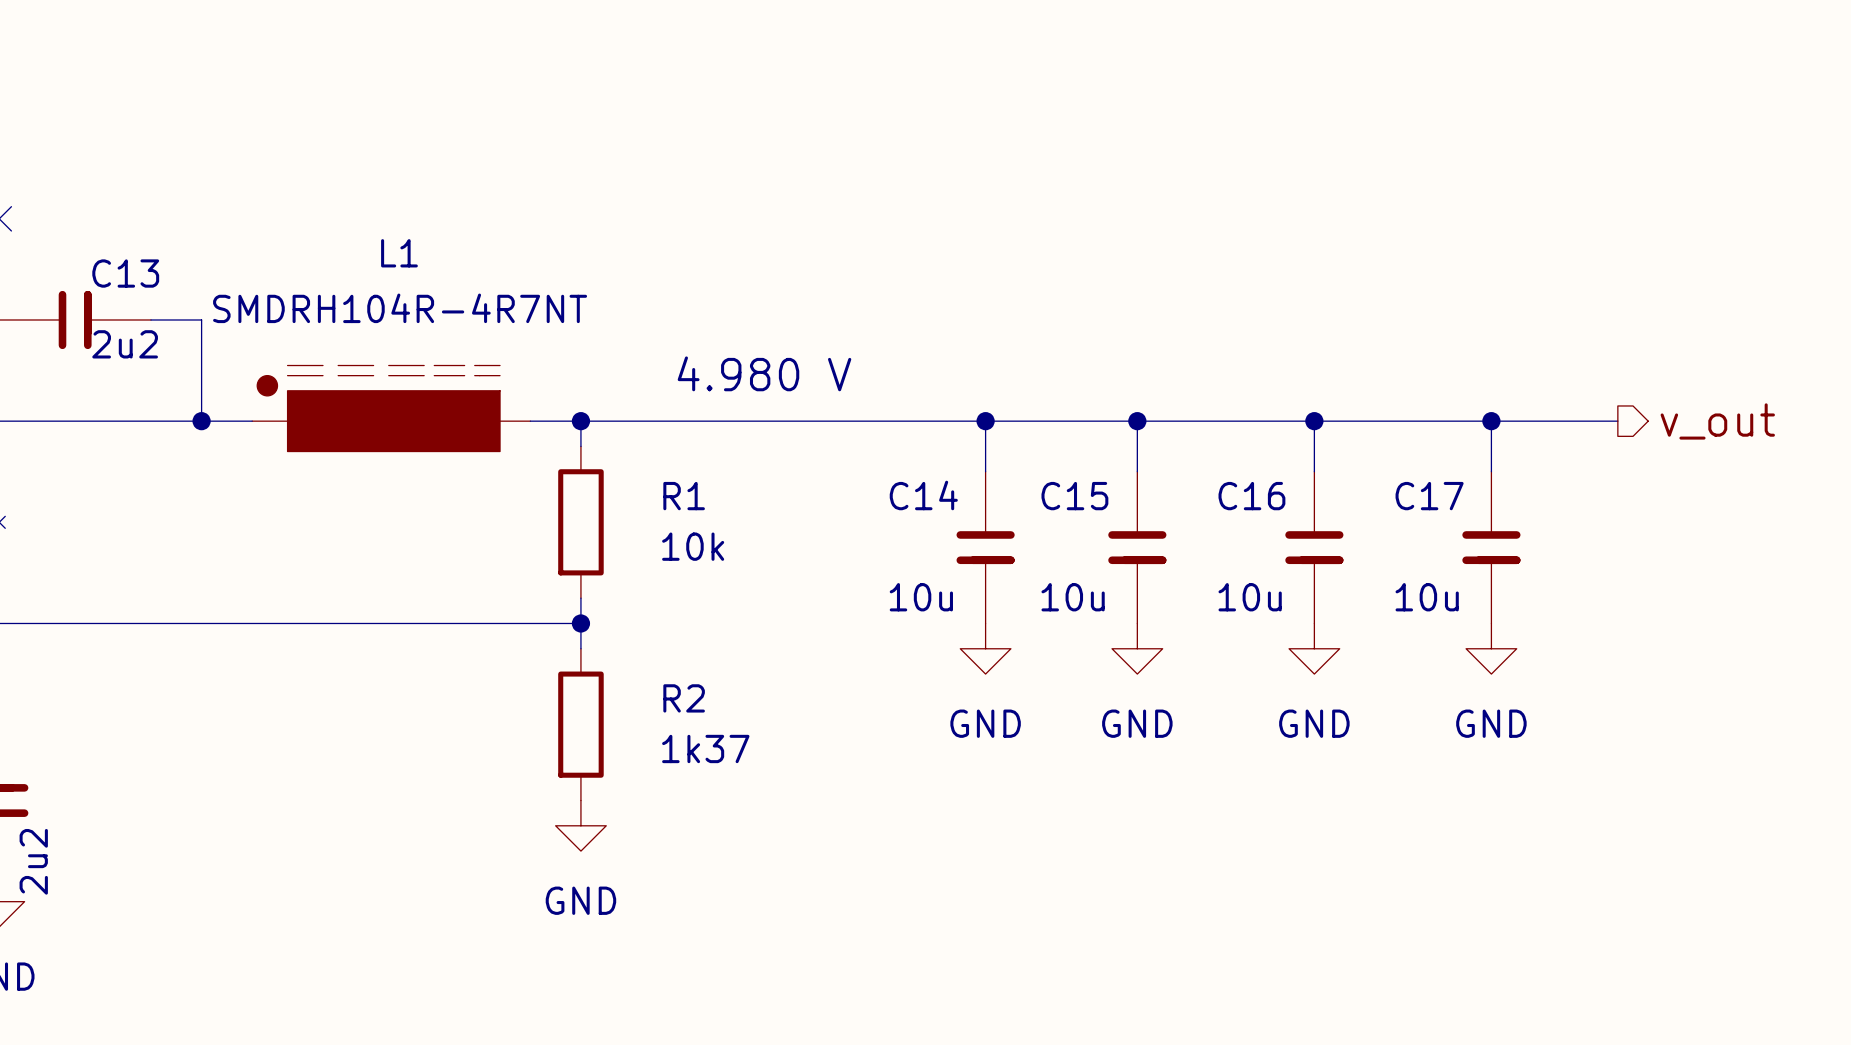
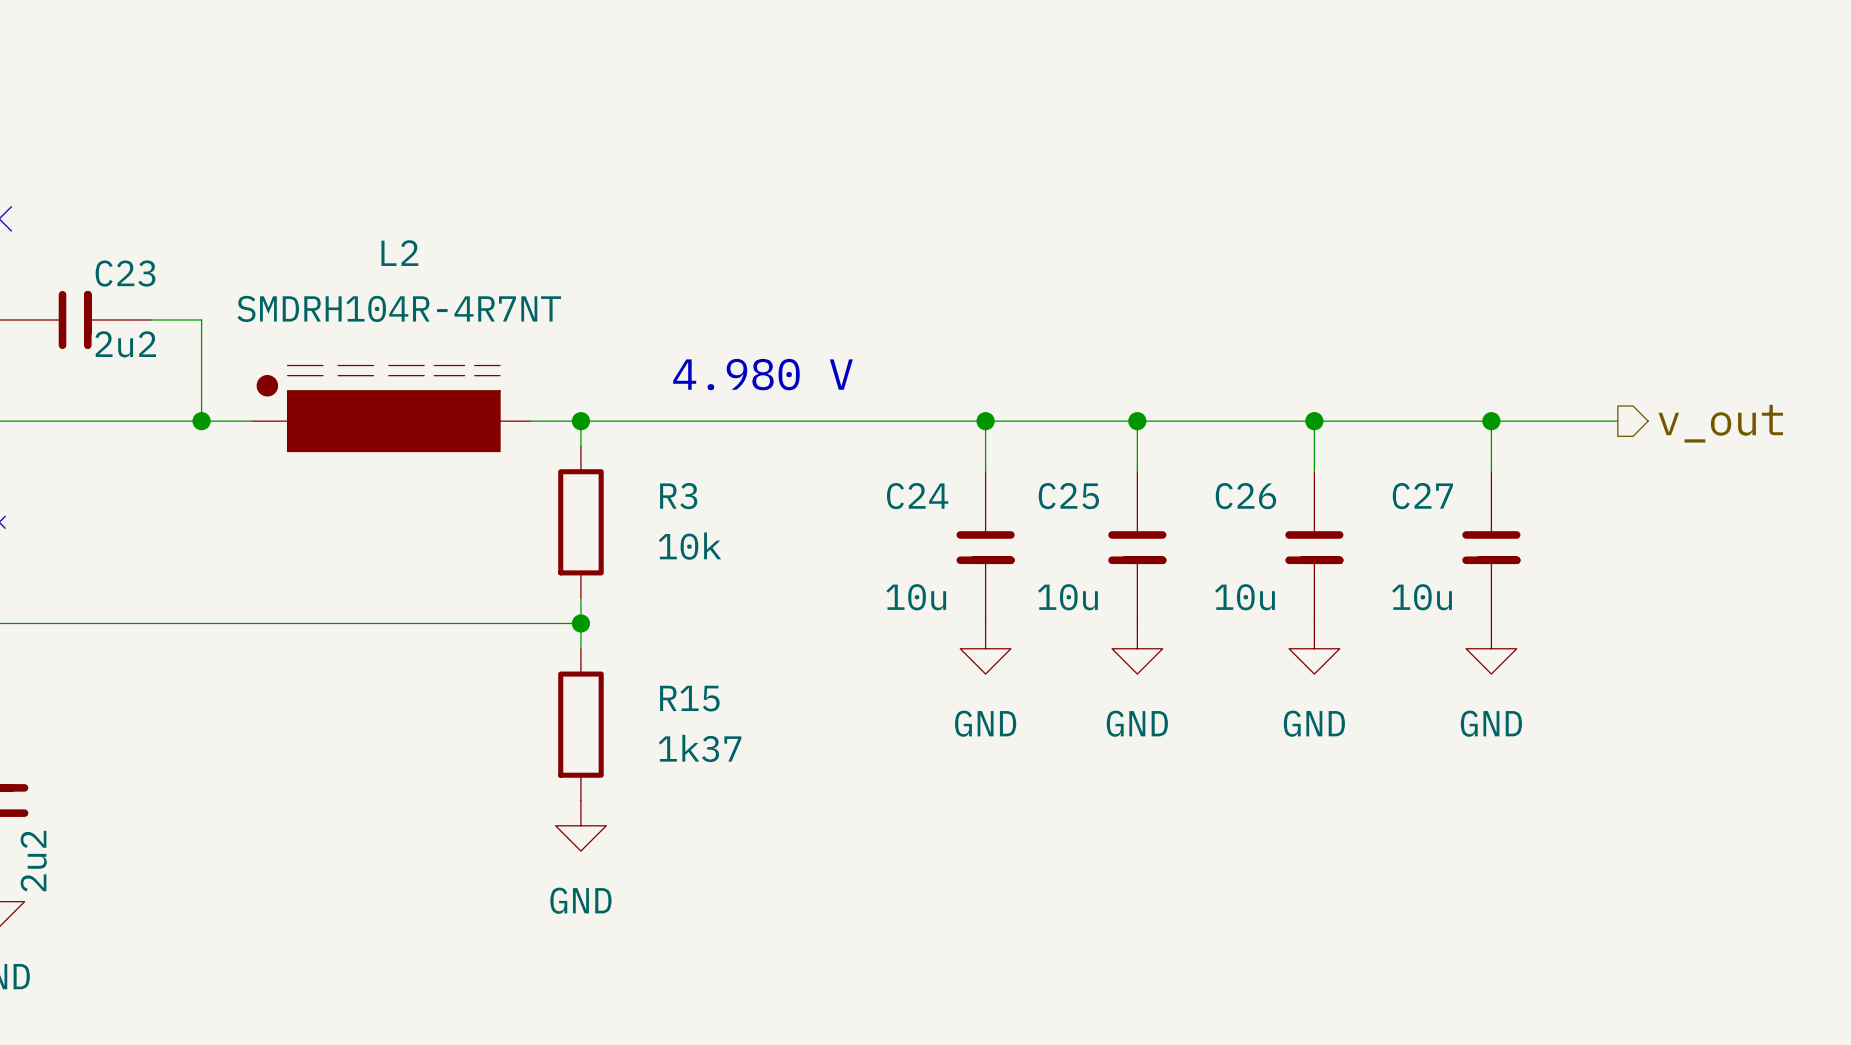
L1 name: L1 (399, 253) -> L2 (399, 253)
C13 name: C13 (125, 273) -> C23 (125, 273)
C14 name: C14 (923, 495) -> C24 (917, 496)
R1 name: R1 (684, 496) -> R3 (678, 496)
C15 name: C15 (1074, 496) -> C25 (1068, 496)
C16 name: C16 (1251, 496) -> C26 (1245, 496)
C17 name: C17 (1429, 496) -> C27 (1422, 496)
R2 name: R2 (684, 698) -> R15 (689, 698)

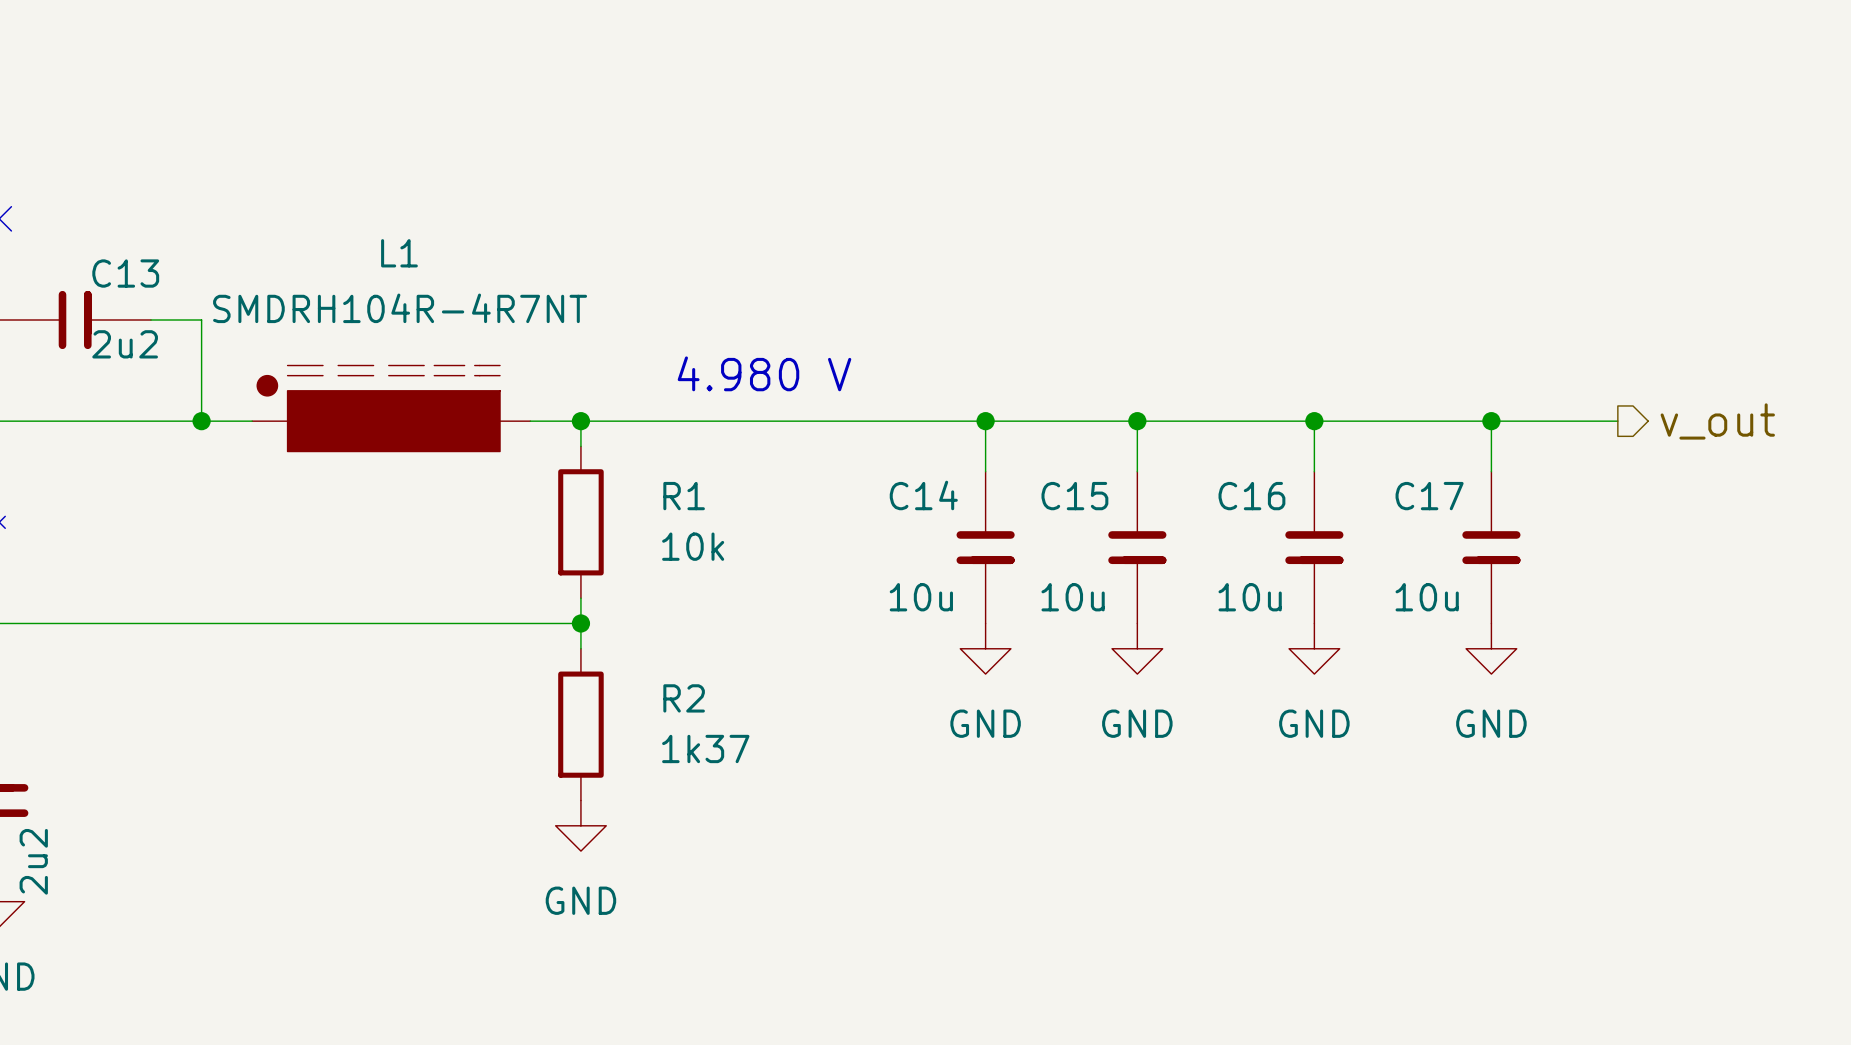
L2 name: L2 (399, 253) -> L1 (399, 253)
C23 name: C23 (125, 273) -> C13 (125, 273)
R3 name: R3 (678, 496) -> R1 (684, 496)
C24 name: C24 (917, 496) -> C14 (923, 495)
C25 name: C25 (1068, 496) -> C15 (1074, 496)
C26 name: C26 (1245, 496) -> C16 (1251, 496)
C27 name: C27 (1422, 496) -> C17 (1429, 496)
R15 name: R15 (689, 698) -> R2 (684, 698)

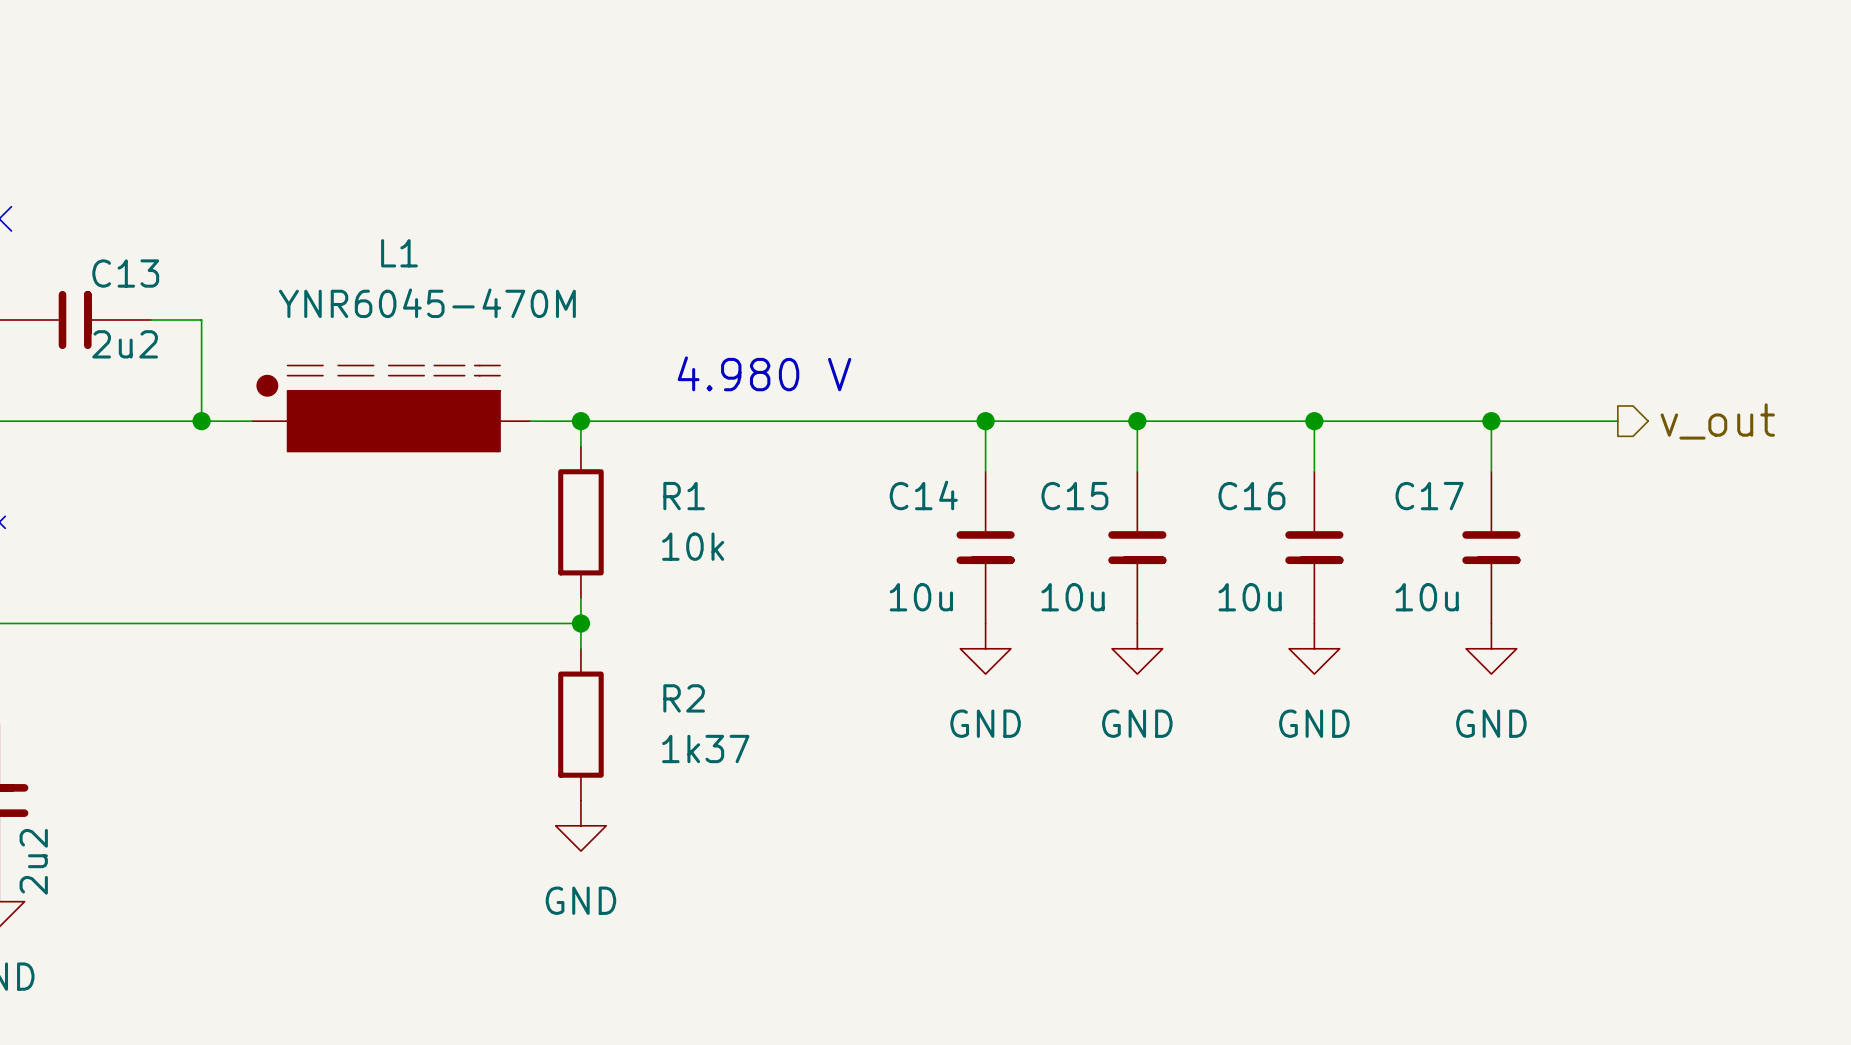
L1 value: SMDRH104R-4R7NT (400, 308) -> YNR6045-470M (427, 303)

